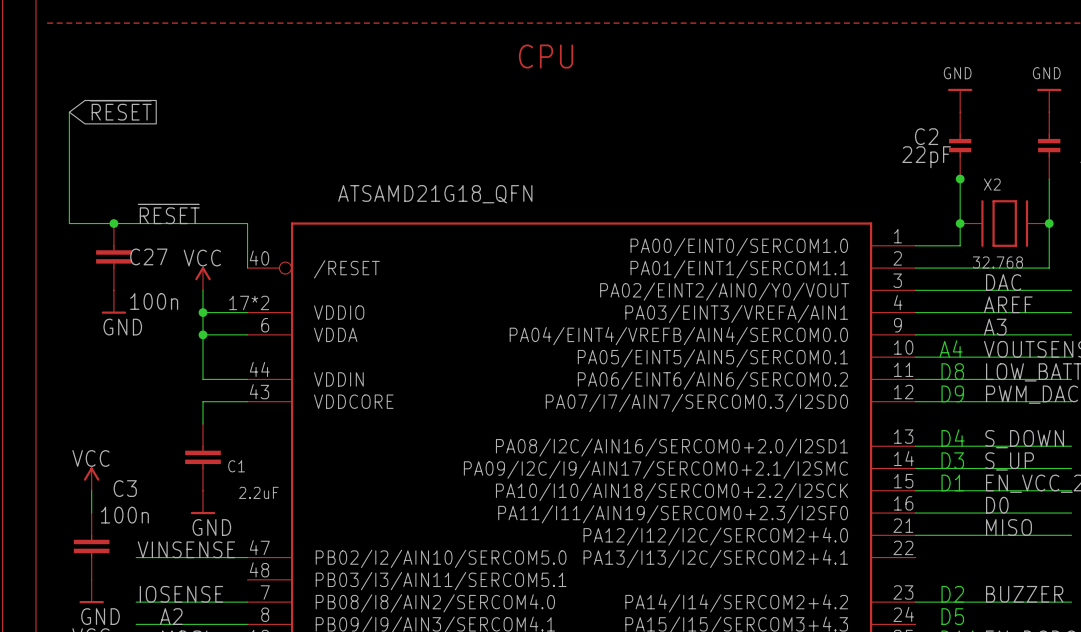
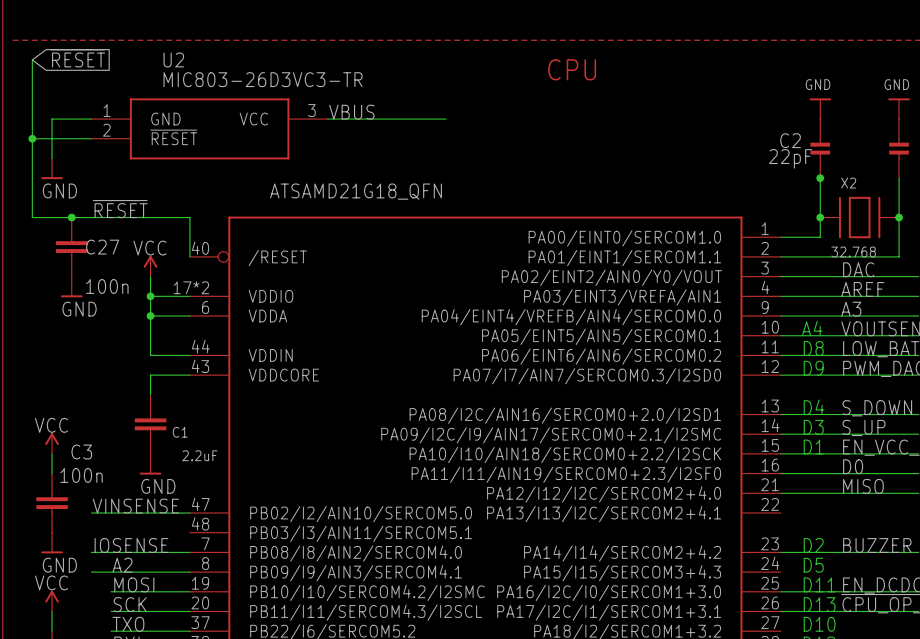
wire: none -> (32, 59) (32, 119)
text position: CPU (546, 56) -> CPU (572, 69)
label: none -> VBUS (351, 112)
global label position: ~{RESET} (120, 110) -> ~{RESET} (77, 58)
wire: none -> (91, 119) (52, 119) (52, 158)
wire: none -> (327, 119) (446, 119)
U2: none -> MIC803-26D3VC3-TR (209, 128)
wire: none -> (32, 138) (91, 138)
junction: none -> (32, 138)
power symbol: none -> GND (52, 168)

